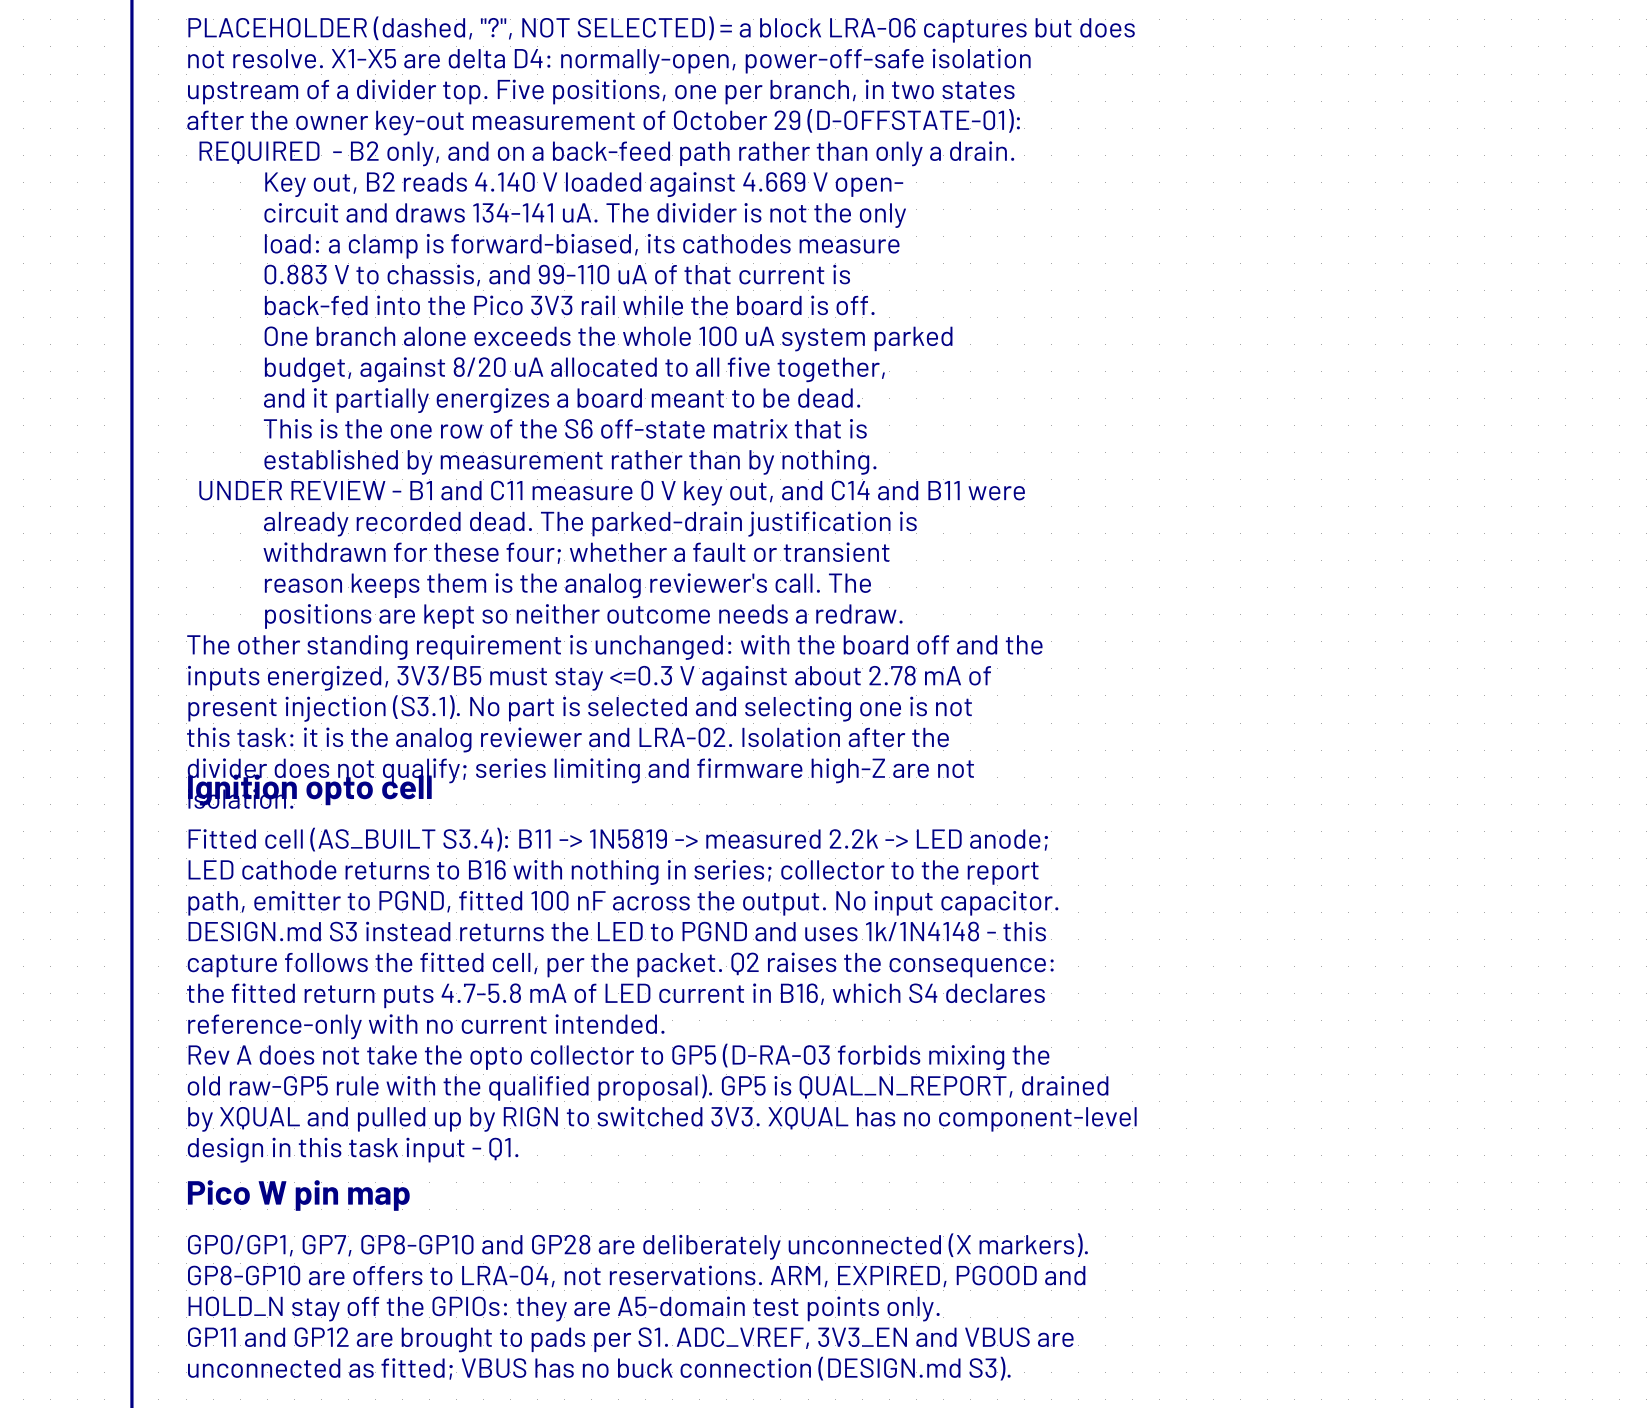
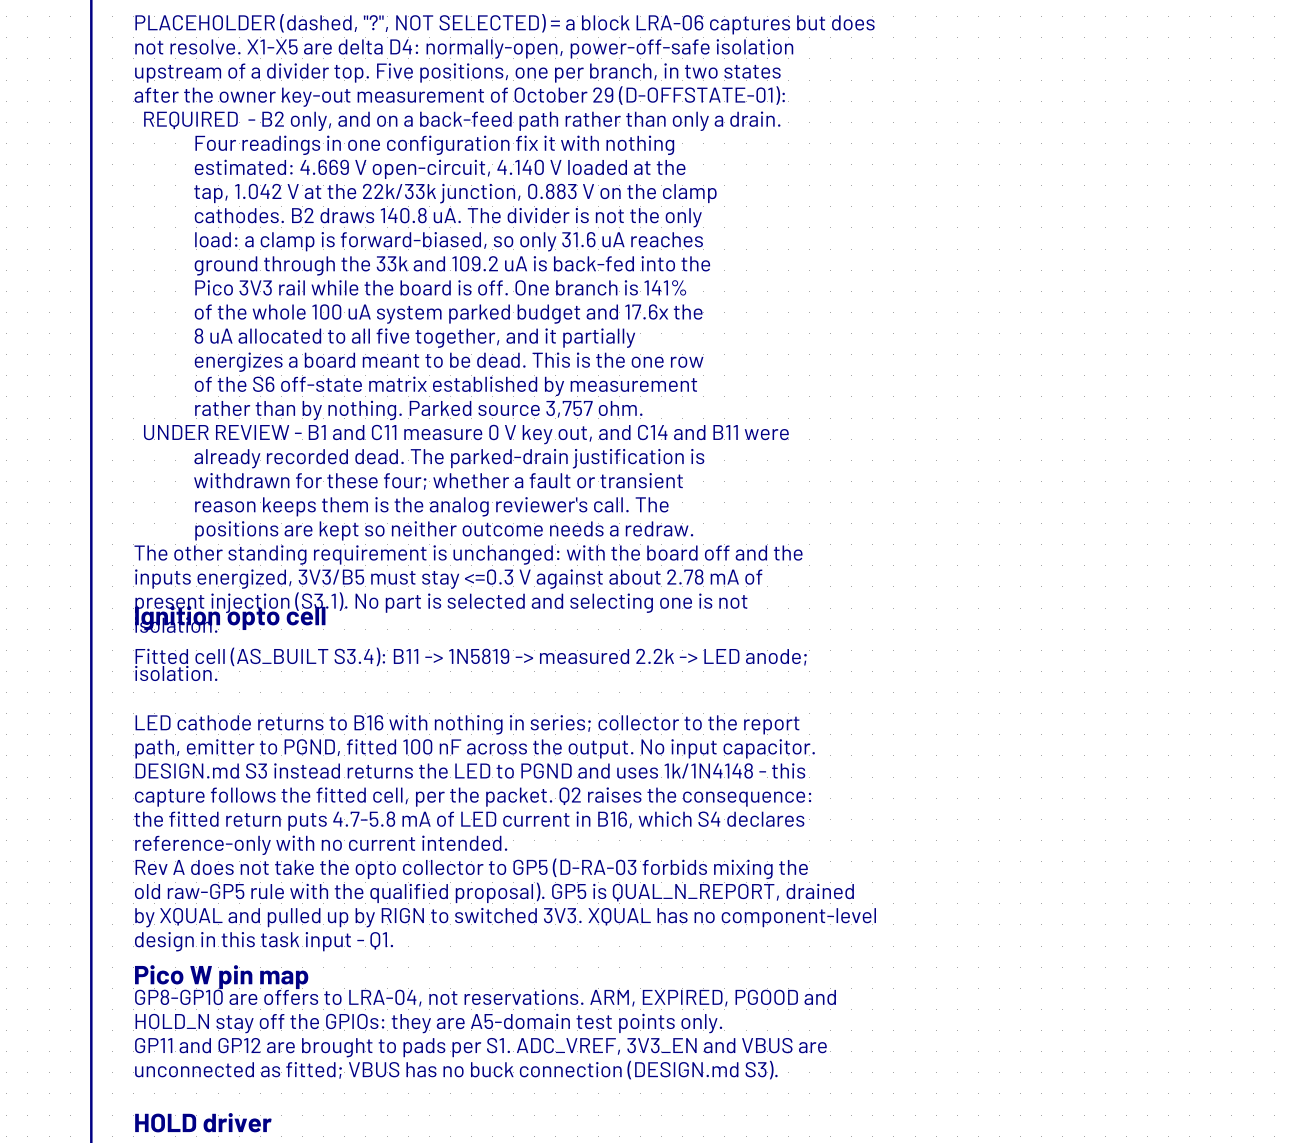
text: Key out, B2 reads 4.140 V loaded against 4.669 V open- (584, 184) -> Four readings in one configuration fix it with nothing (434, 145)
text: circuit and draws 134-141 uA. The divider is not the only (585, 215) -> estimated: 4.669 V open-circuit, 4.140 V loaded at the (440, 169)
text: load: a clamp is forward-biased, its cathodes measure (582, 246) -> tap, 1.042 V at the 22k/33k junction, 0.883 V on the clamp (455, 193)
text: 0.883 V to chassis, and 99-110 uA of that current is (557, 275) -> cathodes. B2 draws 140.8 uA. The divider is not the only (448, 217)
text: back-fed into the Pico 3V3 rail while the board is off. (569, 305) -> load: a clamp is forward-biased, so only 31.6 uA reaches (449, 241)
text: One branch alone exceeds the whole 100 uA system parked (608, 338) -> ground through the 33k and 109.2 uA is back-fed into the (452, 265)
text: budget, against 8/20 uA allocated to all five together, (574, 369) -> Pico 3V3 rail while the board is off. One branch is 141% (440, 287)
text: and it partially energizes a board meant to be dead. (562, 400) -> of the whole 100 uA system parked budget and 17.6x the (448, 314)
text: This is the one row of the S6 off-state matrix that is (565, 428) -> 8 uA allocated to all five together, and it partially (414, 338)
text: established by measurement rather than by nothing. (570, 462) -> energizes a board meant to be dead. This is the one row (449, 362)
text: UNDER REVIEW - B1 and C11 measure 0 V key out, and C14 and B11 were (612, 493) -> of the S6 off-state matrix established by measurement (445, 386)
text: already recorded dead. The parked-drain justification is (590, 524) -> rather than by nothing. Parked source 3,757 ohm. (418, 410)
text: withdrawn for these four; whether a fault or transient (576, 553) -> UNDER REVIEW - B1 and C11 measure 0 V key out, and C14 and B11 were (466, 434)
text: reason keeps them is the analog reviewer's call. The (567, 585) -> already recorded dead. The parked-drain justification is (449, 458)
text: positions are kept so neither outcome needs a redraw. (583, 616) -> withdrawn for these four; whether a fault or transient (438, 481)
text: The other standing requirement is unchanged: with the board off and the (614, 647) -> reason keeps them is the analog reviewer's call. The (431, 506)
text: inputs energized, 3V3/B5 must stay <=0.3 V against about 2.78 mA of (589, 678) -> positions are kept so neither outcome needs a redraw. (444, 530)
text: present injection (S3.1). No part is selected and selecting one is not (580, 708) -> The other standing requirement is unchanged: with the board off and the (468, 555)
text: this task: it is the analog reviewer and LRA-02. Isolation after the (567, 739) -> inputs energized, 3V3/B5 must stay <=0.3 V against about 2.78 mA of (448, 579)
text: divider does not qualify; series limiting and firmware high-Z are not (580, 770) -> present injection (S3.1). No part is selected and selecting one is not (441, 602)
text: none -> isolation. (176, 673)
text position: LED cathode returns to B16 with nothing in series; collector to the report (613, 872) -> LED cathode returns to B16 with nothing in series; collector to the report (467, 724)
text position: path, emitter to PGND, fitted 100 nF across the output. No input capacitor. (623, 903) -> path, emitter to PGND, fitted 100 nF across the output. No input capacitor. (475, 748)
text position: DESIGN.md S3 instead returns the LED to PGND and uses 1k/1N4148 - this (617, 931) -> DESIGN.md S3 instead returns the LED to PGND and uses 1k/1N4148 - this (470, 770)
text position: capture follows the fitted cell, per the packet. Q2 raises the consequence: (620, 964) -> capture follows the fitted cell, per the packet. Q2 raises the consequence: (473, 797)
text position: the fitted return puts 4.7-5.8 mA of LED current in B16, which S4 declares (615, 995) -> the fitted return puts 4.7-5.8 mA of LED current in B16, which S4 declares (469, 821)
text position: reference-only with no current intended. (426, 1026) -> reference-only with no current intended. (321, 845)
text position: Rev A does not take the opto collector to GP5 (D-RA-03 forbids mixing the (618, 1056) -> Rev A does not take the opto collector to GP5 (D-RA-03 forbids mixing the (471, 868)
text position: old raw-GP5 rule with the qualified proposal). GP5 is QUAL_N_REPORT, drained (648, 1087) -> old raw-GP5 rule with the qualified proposal). GP5 is QUAL_N_REPORT, drained (494, 892)
text position: by XQUAL and pulled up by RIGN to switched 3V3. XQUAL has no component-level (662, 1119) -> by XQUAL and pulled up by RIGN to switched 3V3. XQUAL has no component-level (505, 917)
text position: design in this task input - Q1. (353, 1150) -> design in this task input - Q1. (264, 941)
text: Pico W pin map (298, 1195) -> none
text: GP0/GP1, GP7, GP8-GP10 and GP28 are deliberately unconnected (X markers). (637, 1246) -> Pico W pin map (221, 977)

